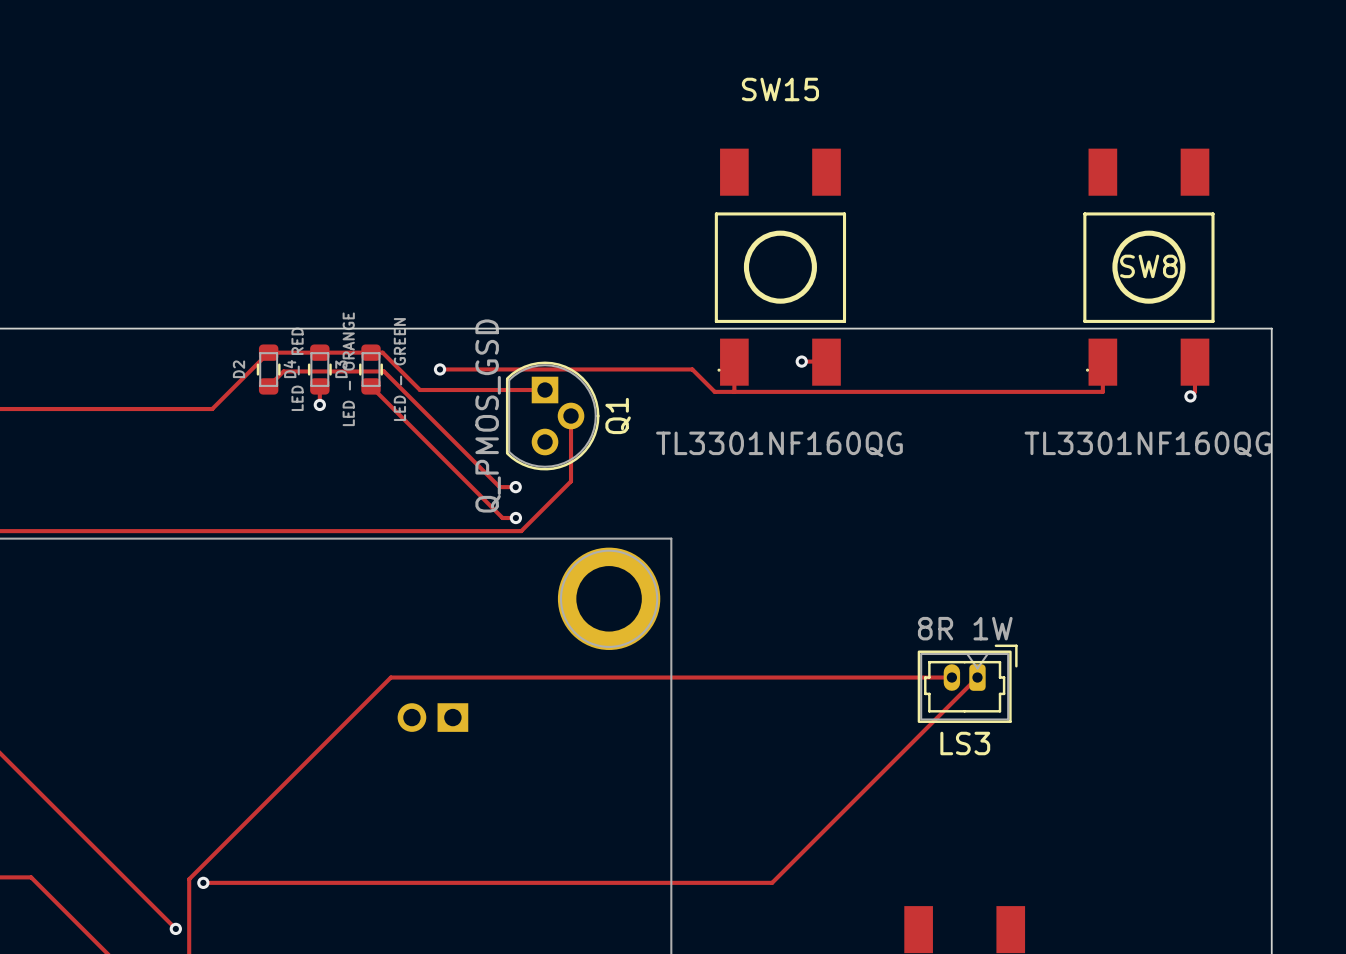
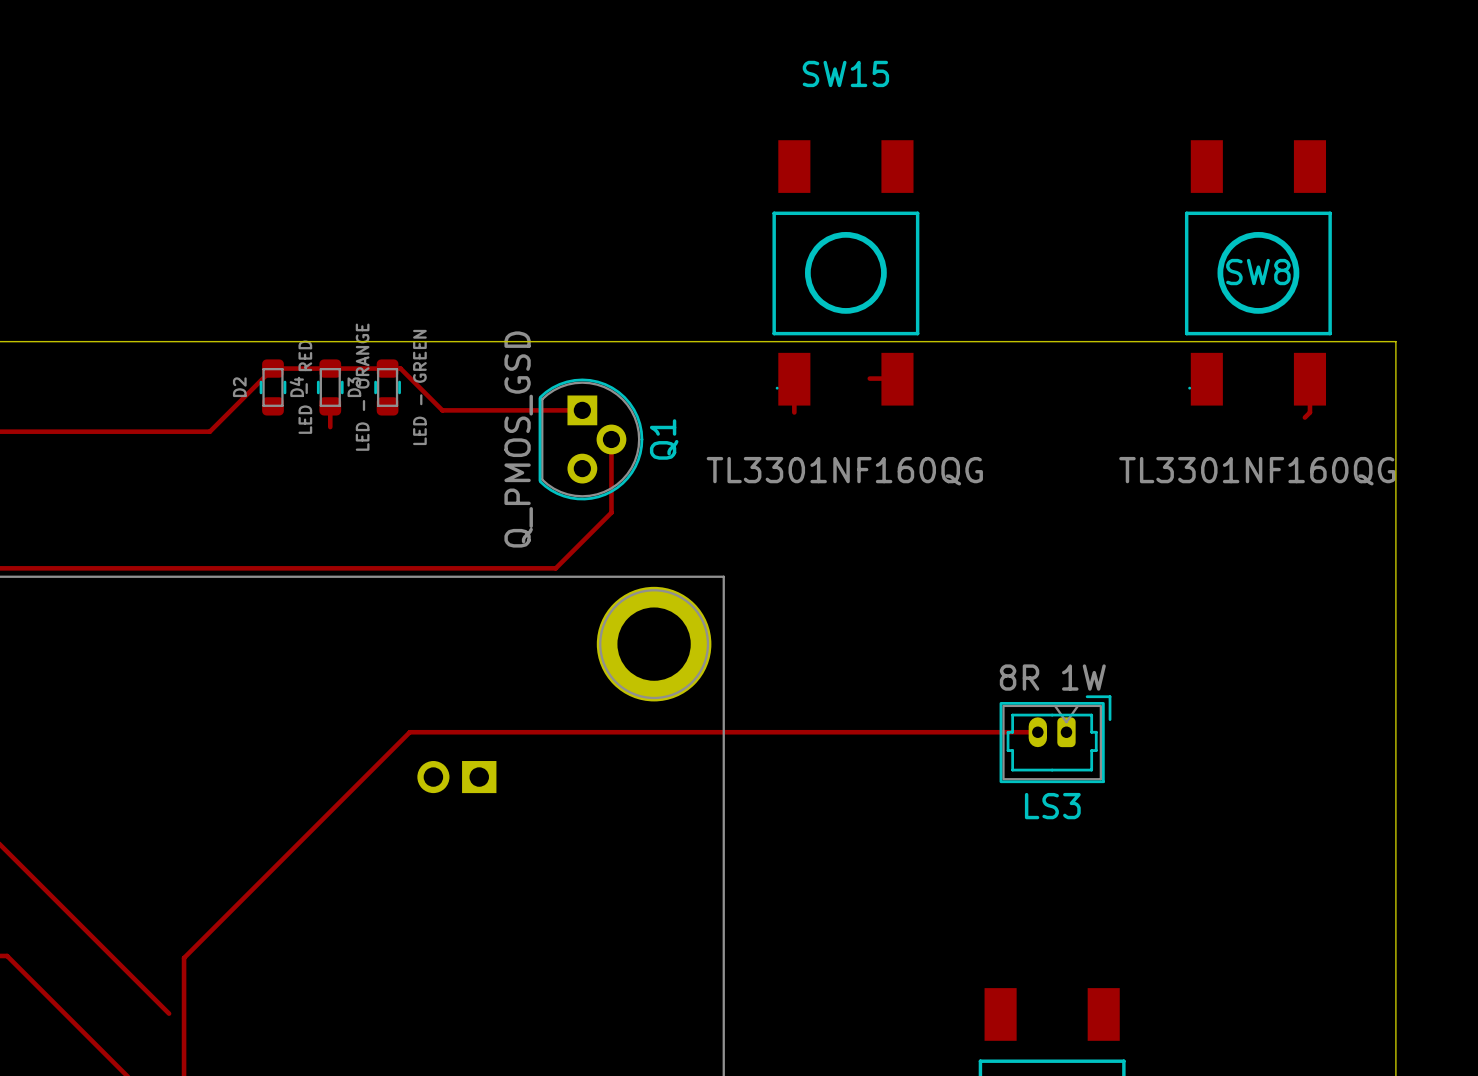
via: (801, 361) -> none
track: (1102, 362) (1102, 391) (714, 391) (692, 369) (440, 369) -> none
via: (440, 369) -> none
track: (268, 386) (283, 371) (384, 371) (499, 487) (515, 487) -> none
track: (371, 386) (502, 518) (515, 518) -> none
via: (1190, 396) -> none
via: (319, 404) -> none
via: (515, 487) -> none
via: (515, 518) -> none
track: (977, 677) (772, 882) (203, 882) -> none
via: (203, 882) -> none
via: (175, 928) -> none

